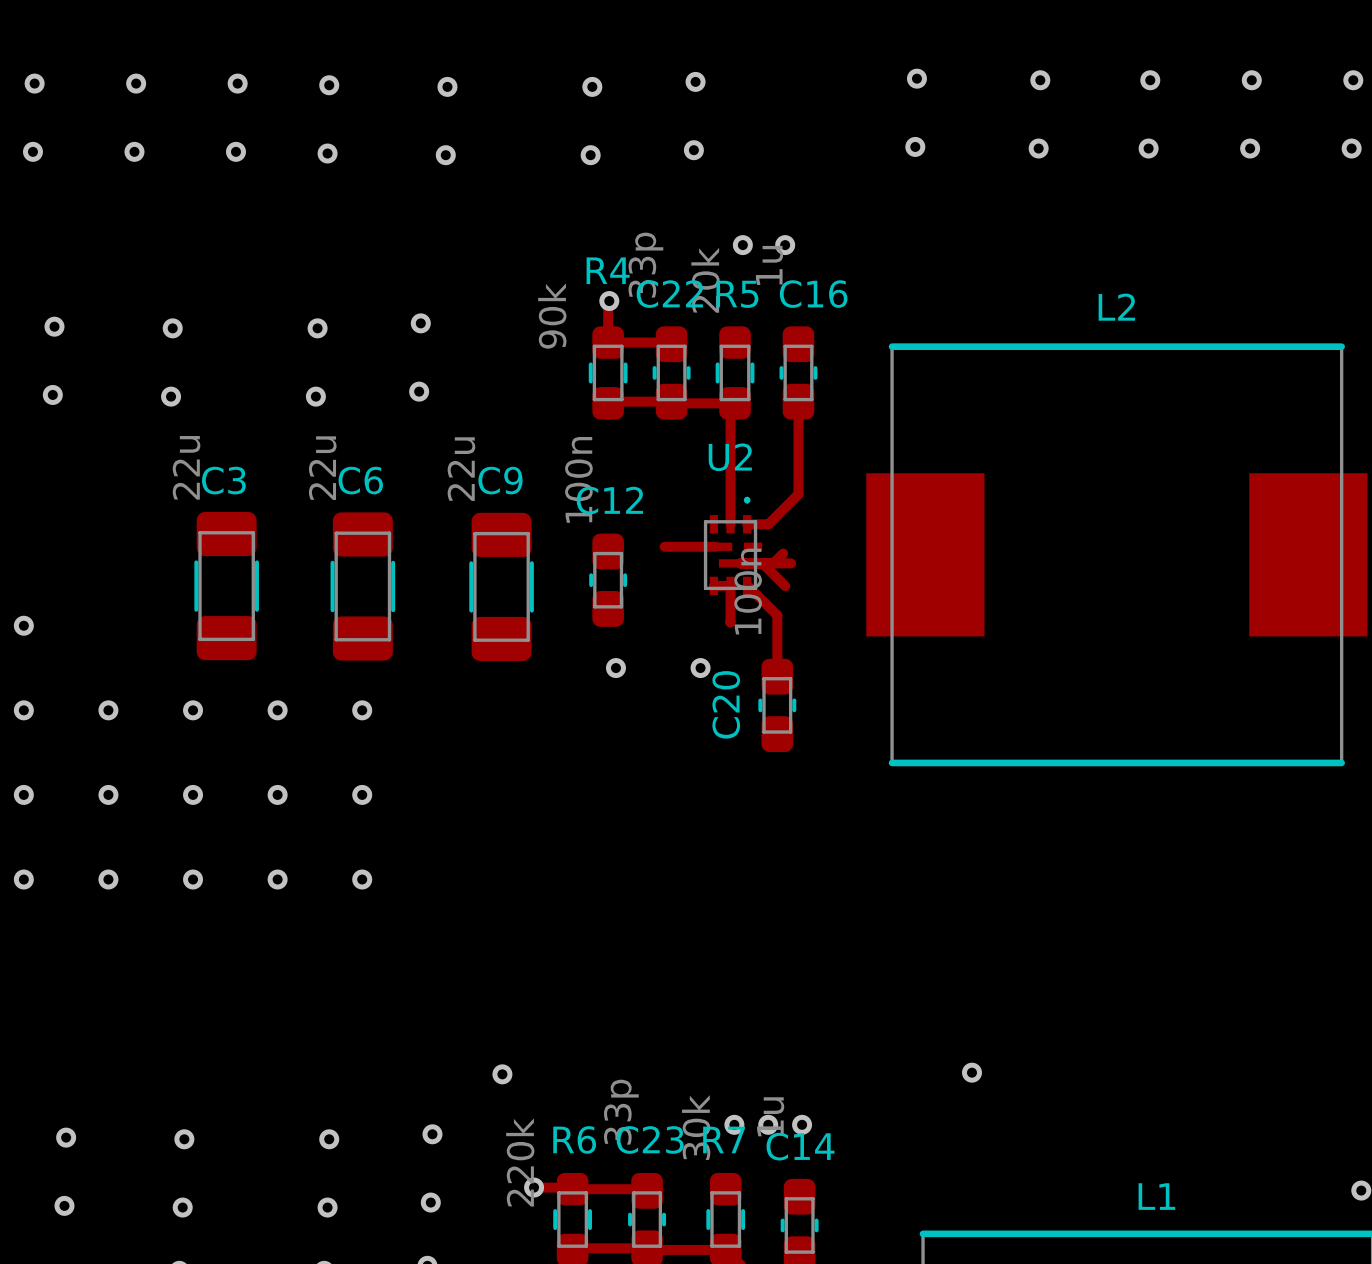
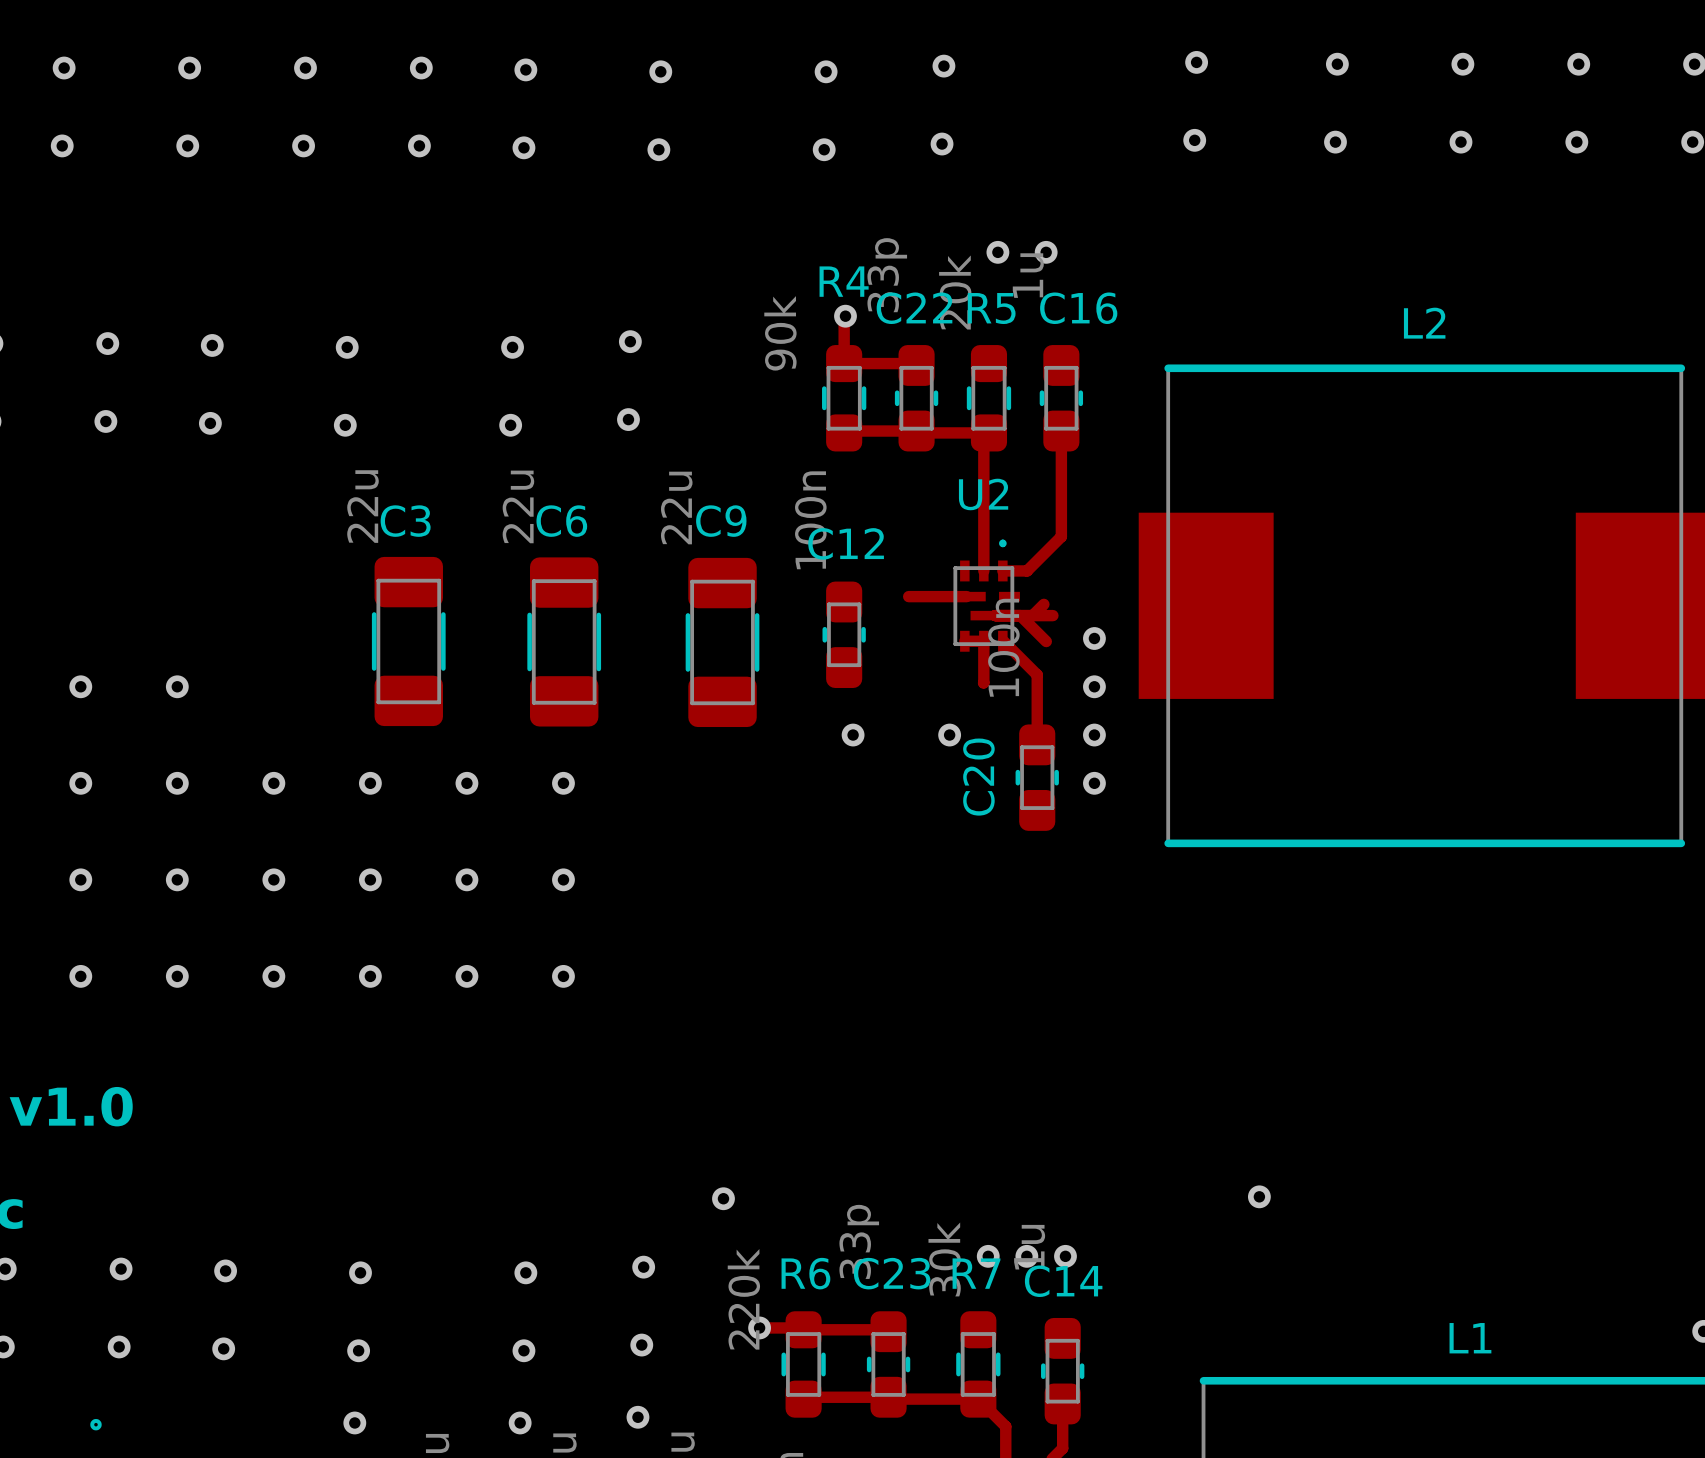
via: none -> (1094, 638)
via: none -> (1094, 686)
via: none -> (1094, 735)
via: none -> (1094, 783)

